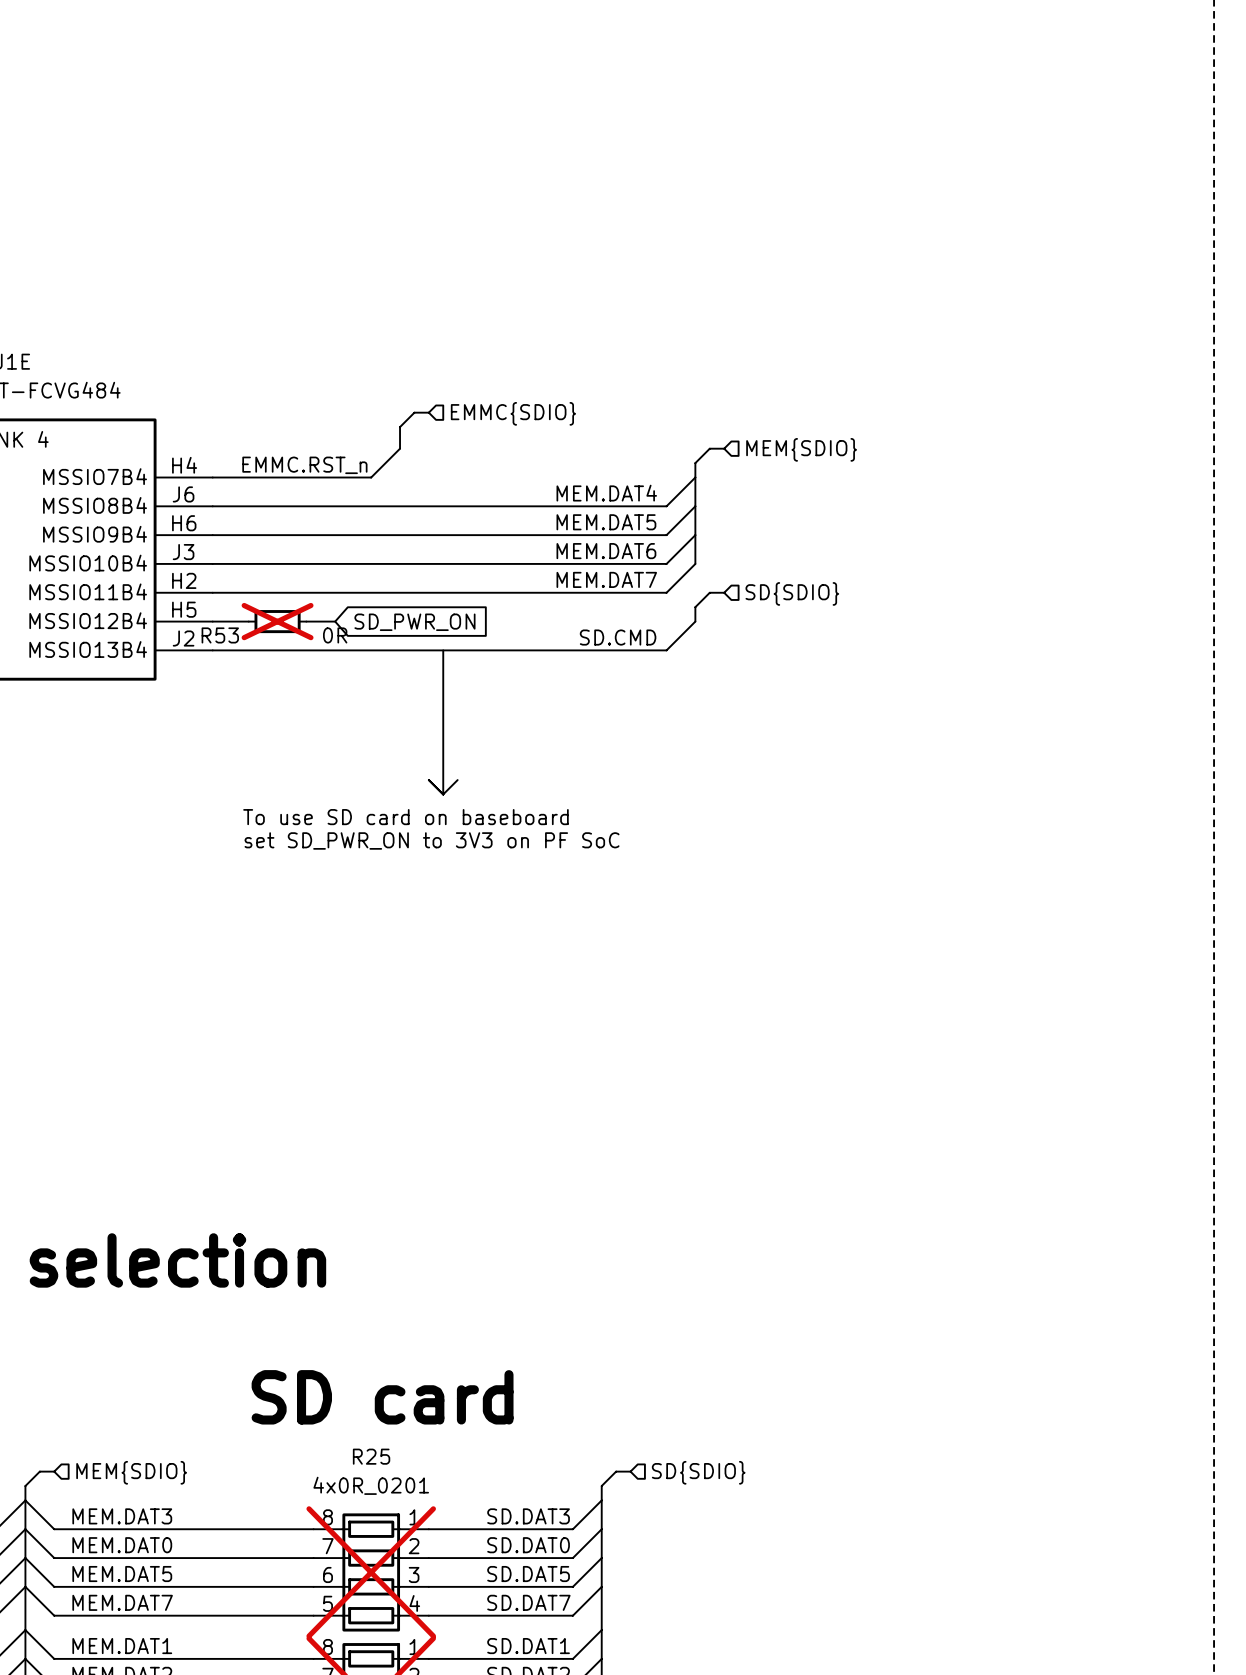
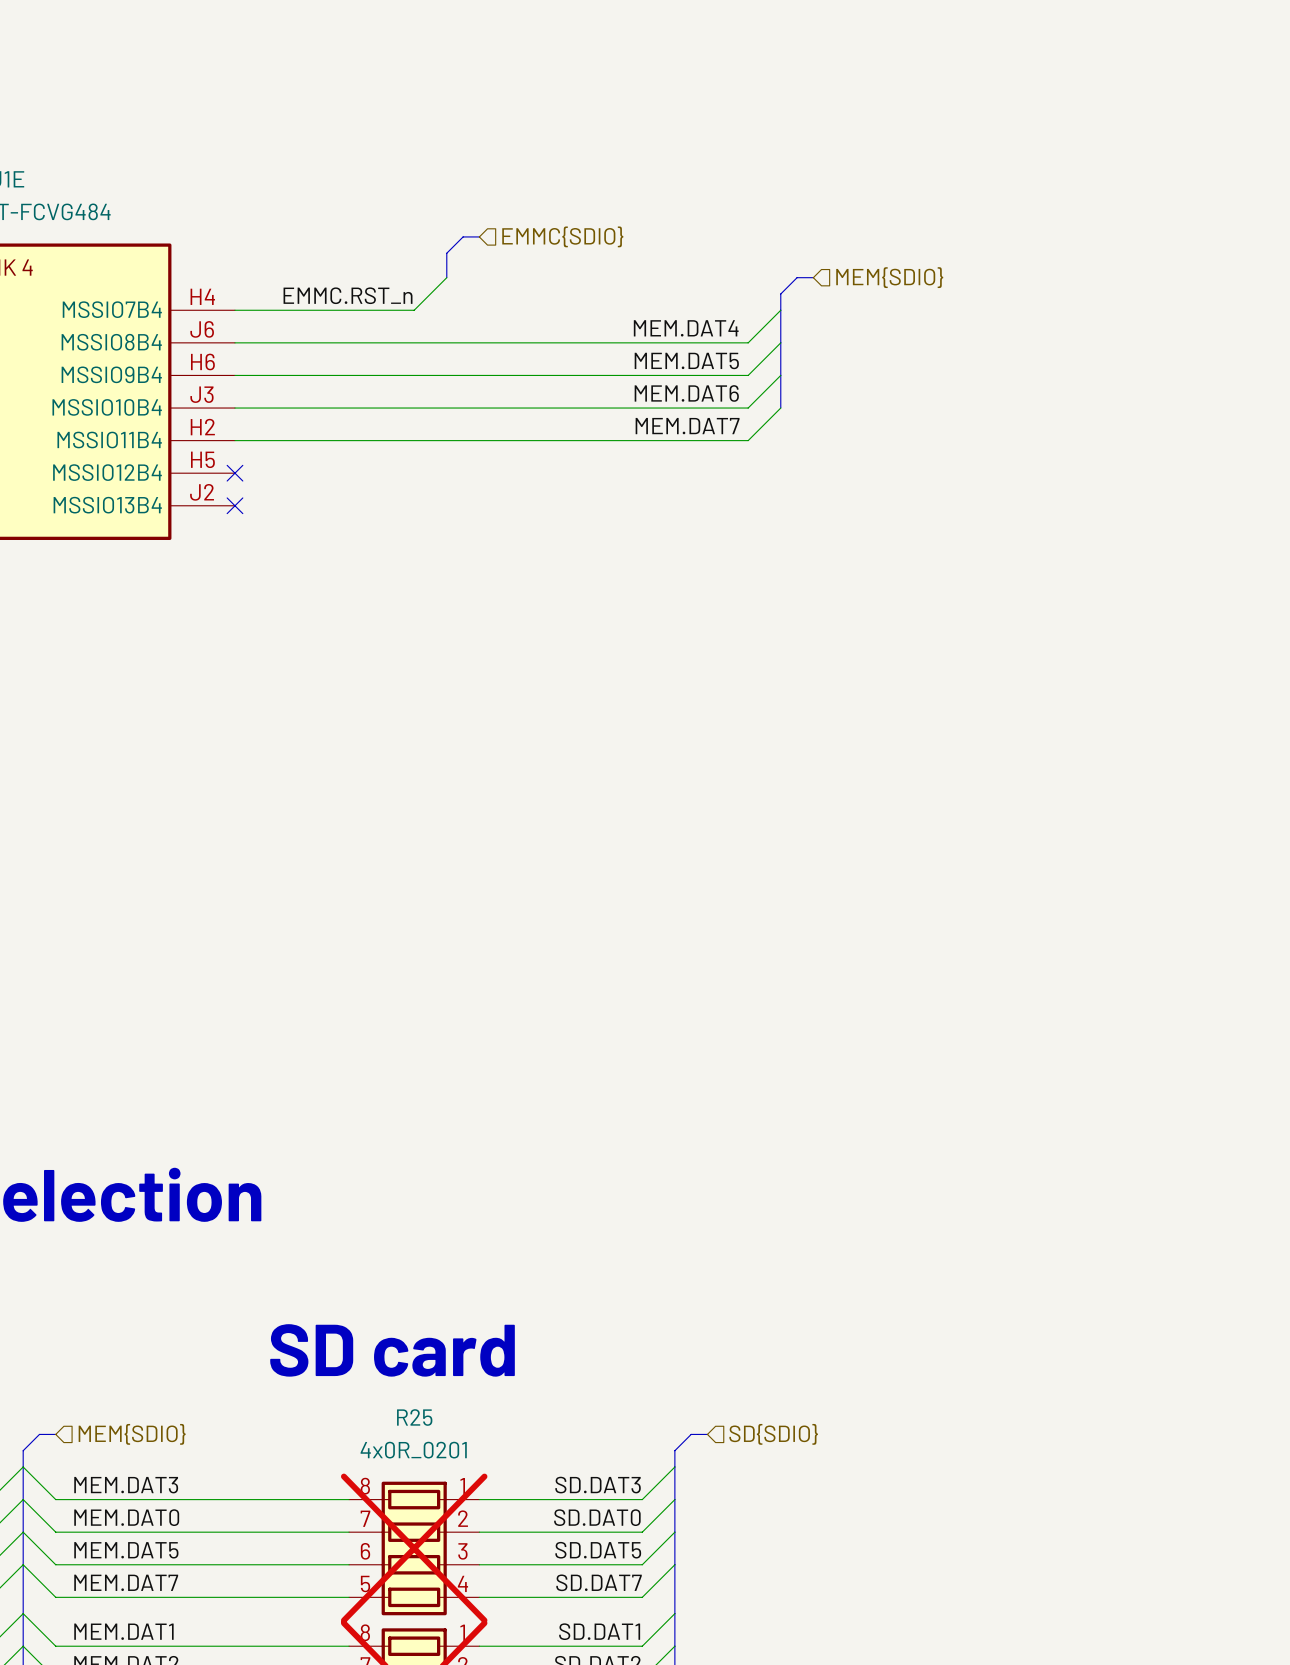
bus: (724, 592) (709, 592) (695, 607) (695, 621) -> none
hierarchical label: SD{SDIO} (792, 593) -> none
wire: (212, 621) (248, 621) -> none
no-connect mark: none -> (234, 473)
R53: (277, 621) -> none
wire: (306, 621) (335, 621) -> none
wire: (695, 621) (666, 650) (212, 650) -> none
global label: SD_PWR_ON (414, 622) -> none
label: SD.CMD (618, 637) -> none
no-connect mark: none -> (234, 505)
line: (443, 650) (443, 794) -> none
line: (428, 780) (443, 794) -> none
line: (457, 780) (443, 794) -> none
text: To use SD card on baseboard (405, 817) -> none
text: set SD_PWR_ON to 3V3 on PF SoC (432, 840) -> none

